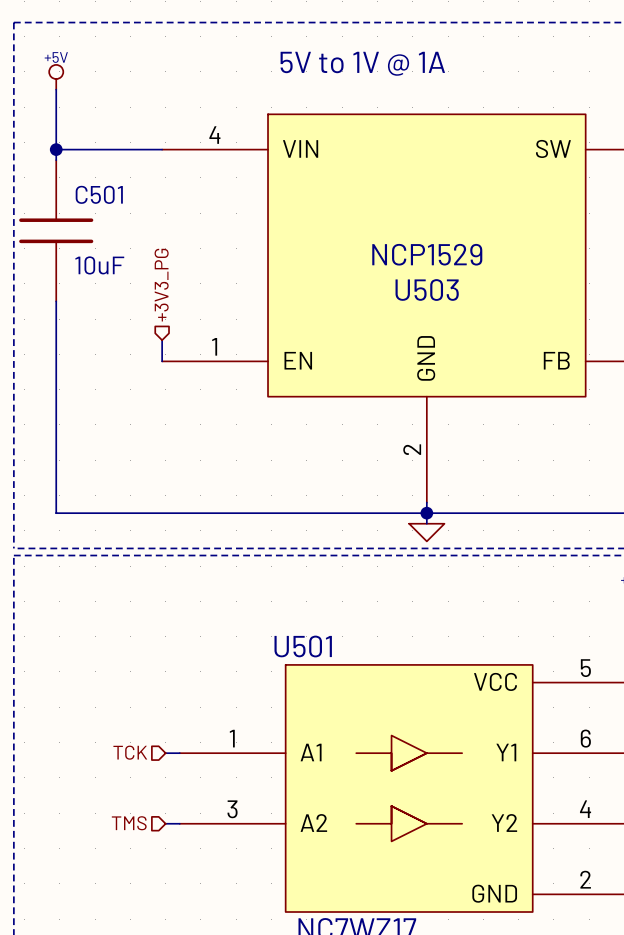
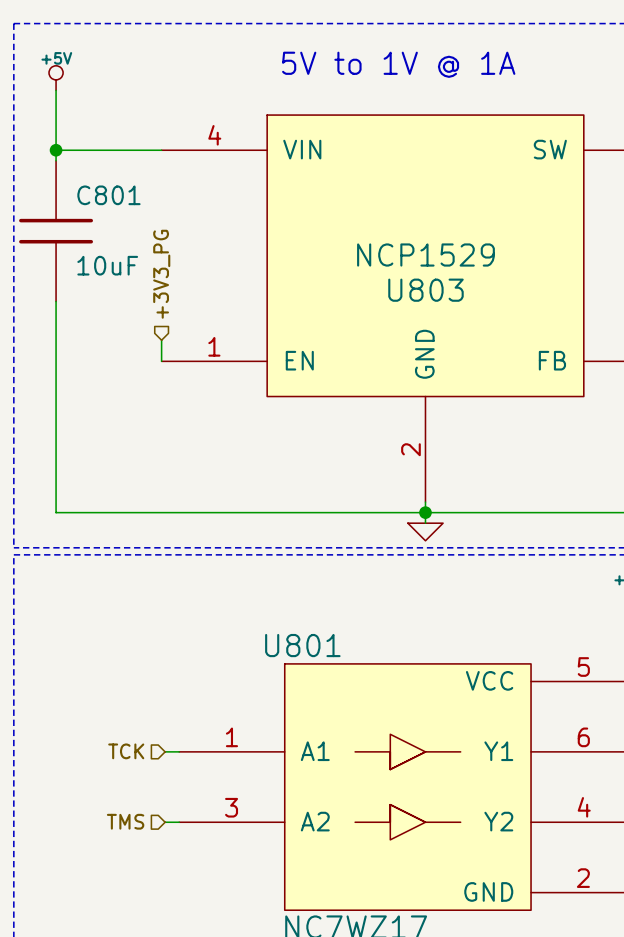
C501 name: C501 (99, 194) -> C801 (108, 195)
U503 name: U503 (427, 290) -> U803 (425, 290)
U501 name: U501 (303, 646) -> U801 (302, 645)

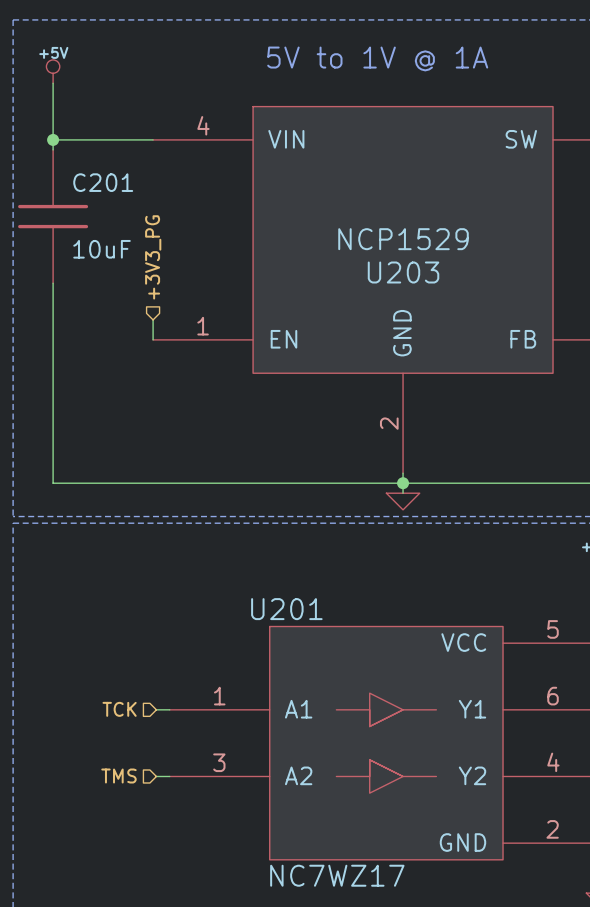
C801 name: C801 (108, 195) -> C201 (103, 182)
U803 name: U803 (425, 290) -> U203 (403, 272)
U801 name: U801 (302, 645) -> U201 (286, 609)

